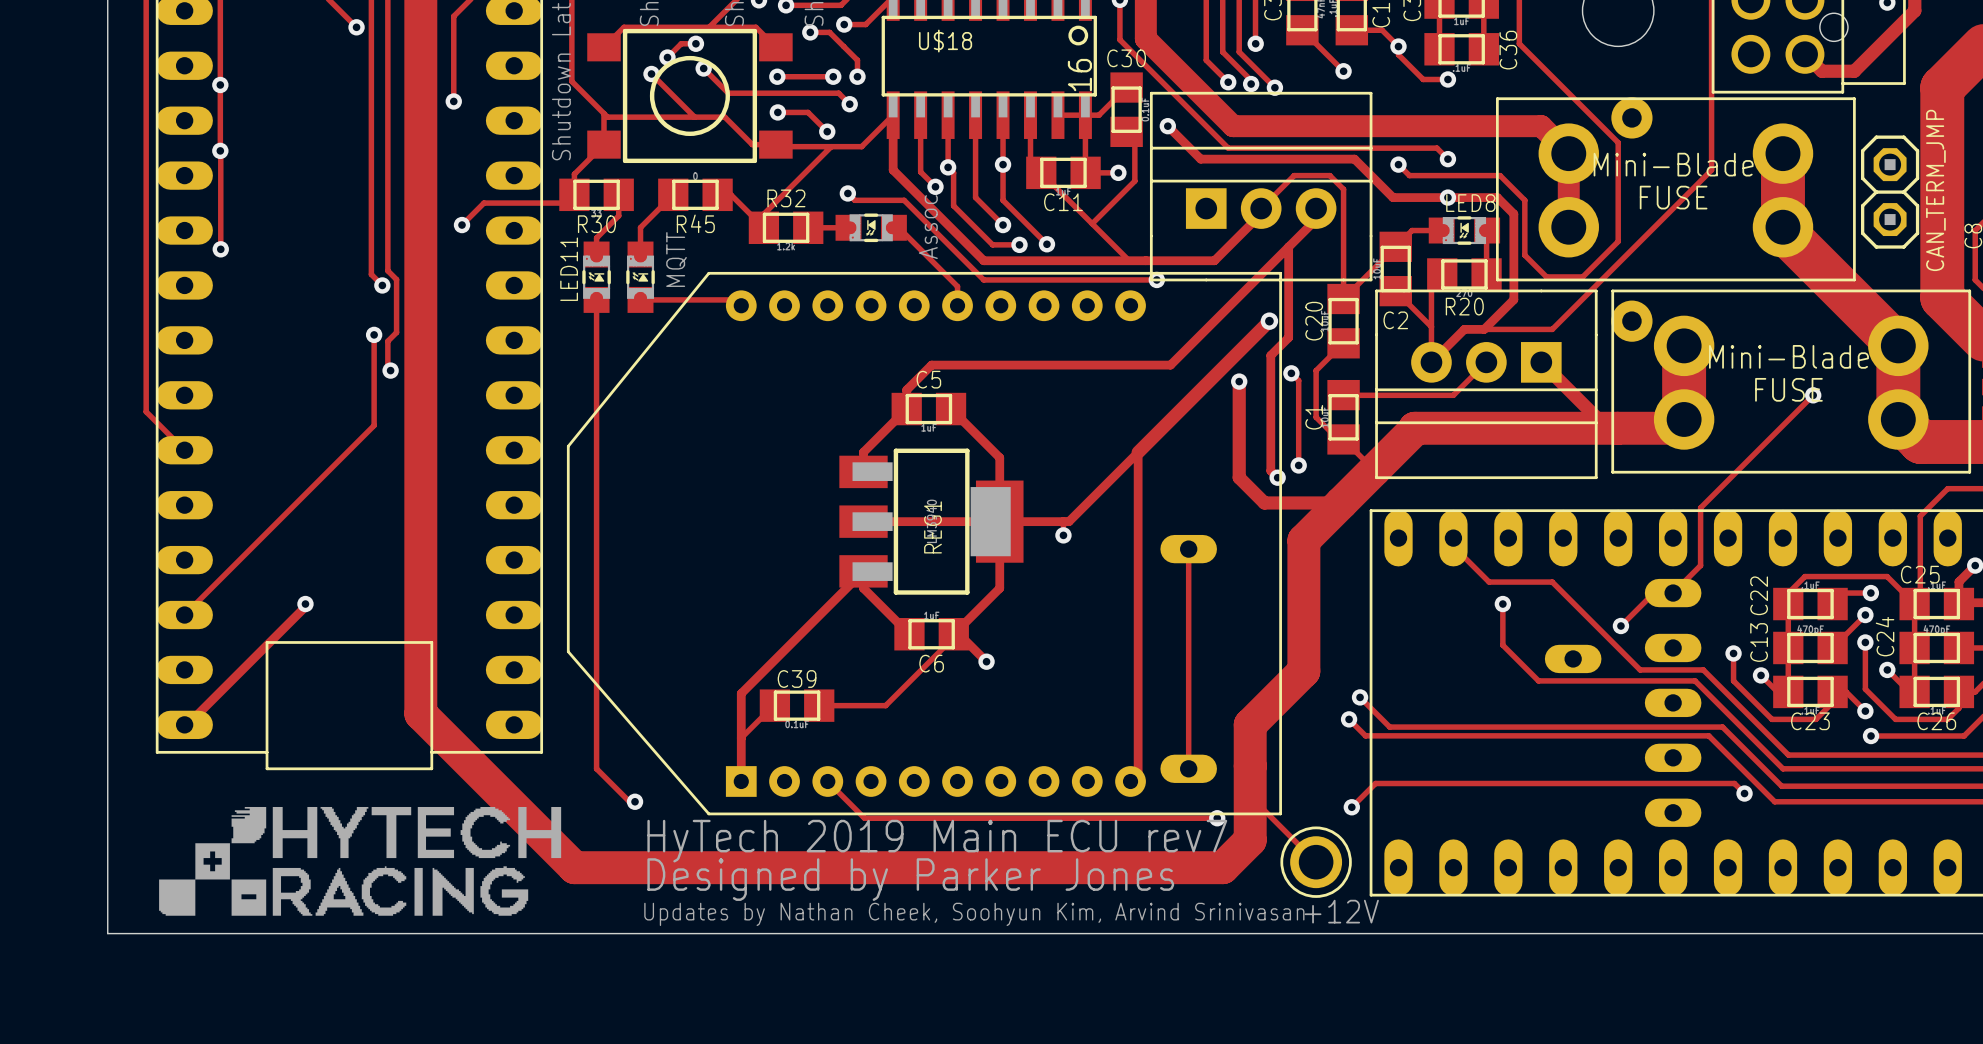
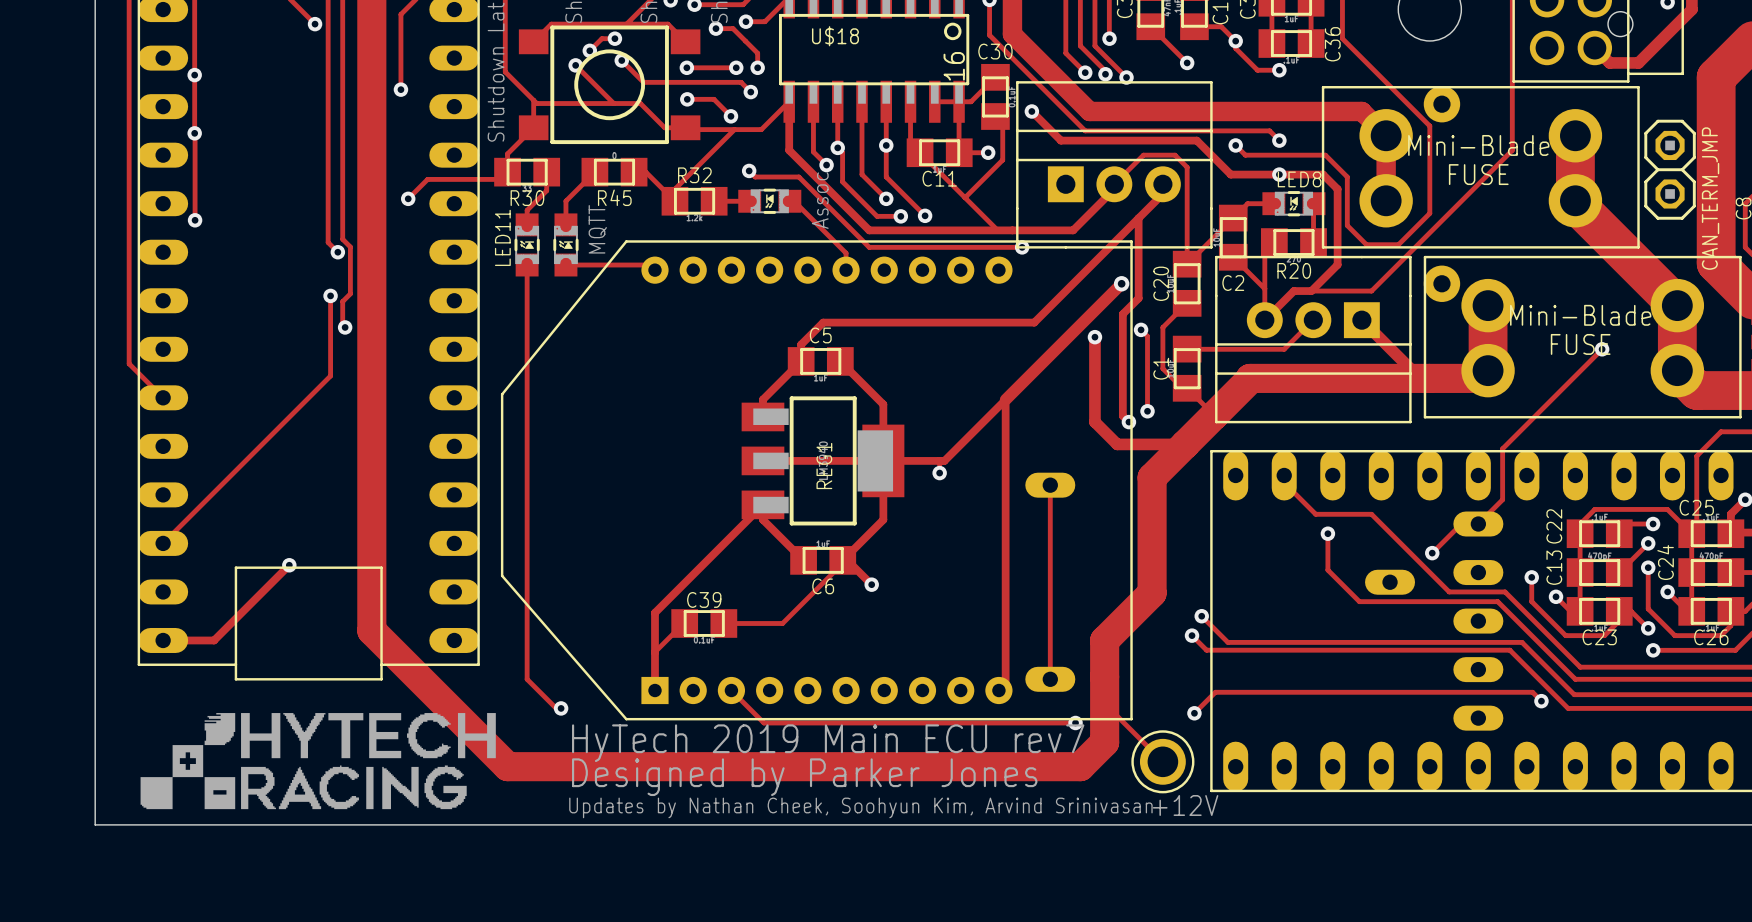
CAN_TERM_JMP name position: CAN_TERM_JMP (1935, 190) -> CAN_TERM_JMP (1710, 198)
track: (305, 604) (305, 606) (187, 724) -> (289, 565) (214, 640) (165, 640)
via position: (305, 604) -> (289, 565)

